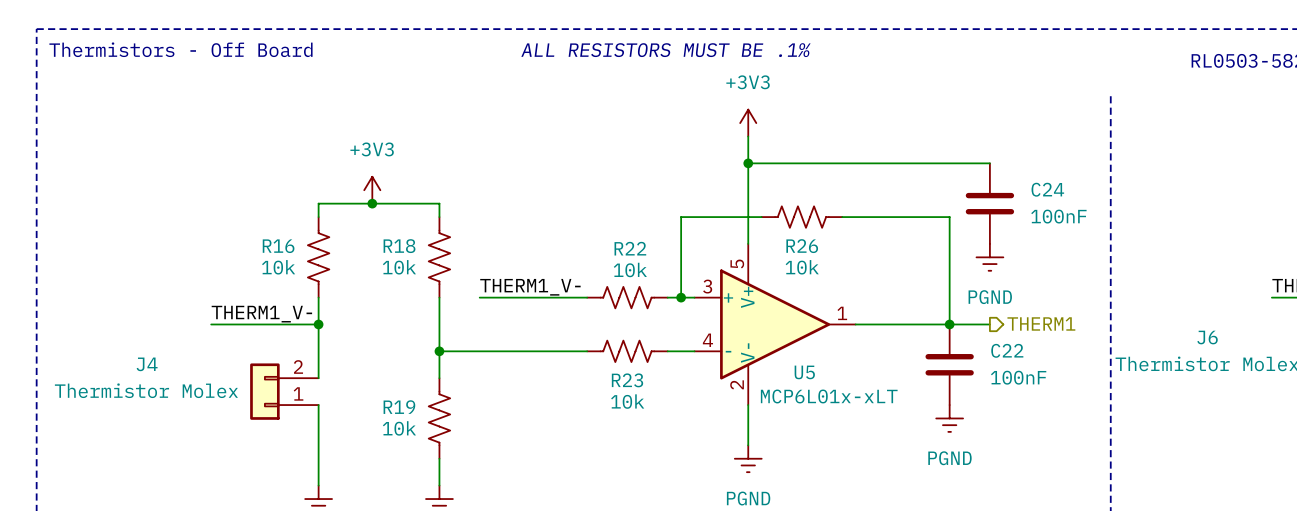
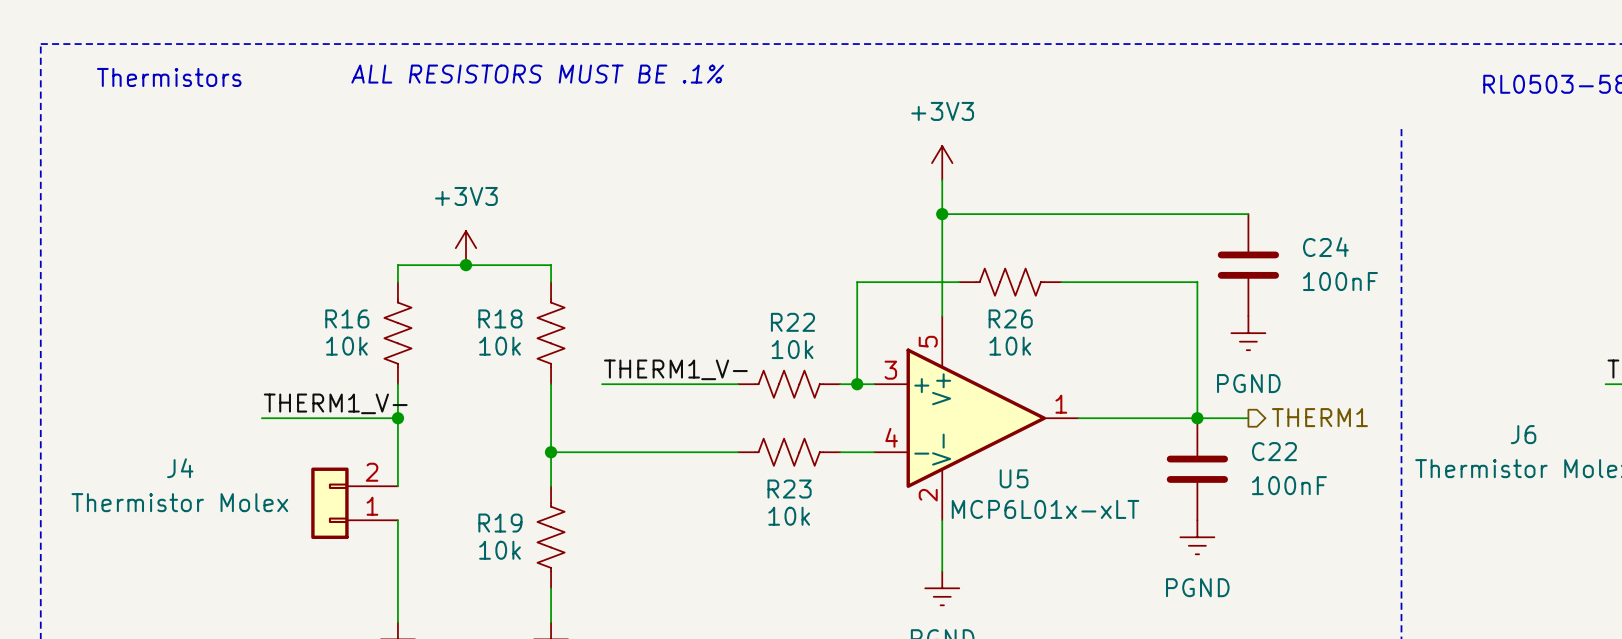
text: Thermistors - Off Board (180, 49) -> Thermistors (169, 77)
text position: ALL RESISTORS MUST BE .1% (665, 50) -> ALL RESISTORS MUST BE .1% (537, 74)

